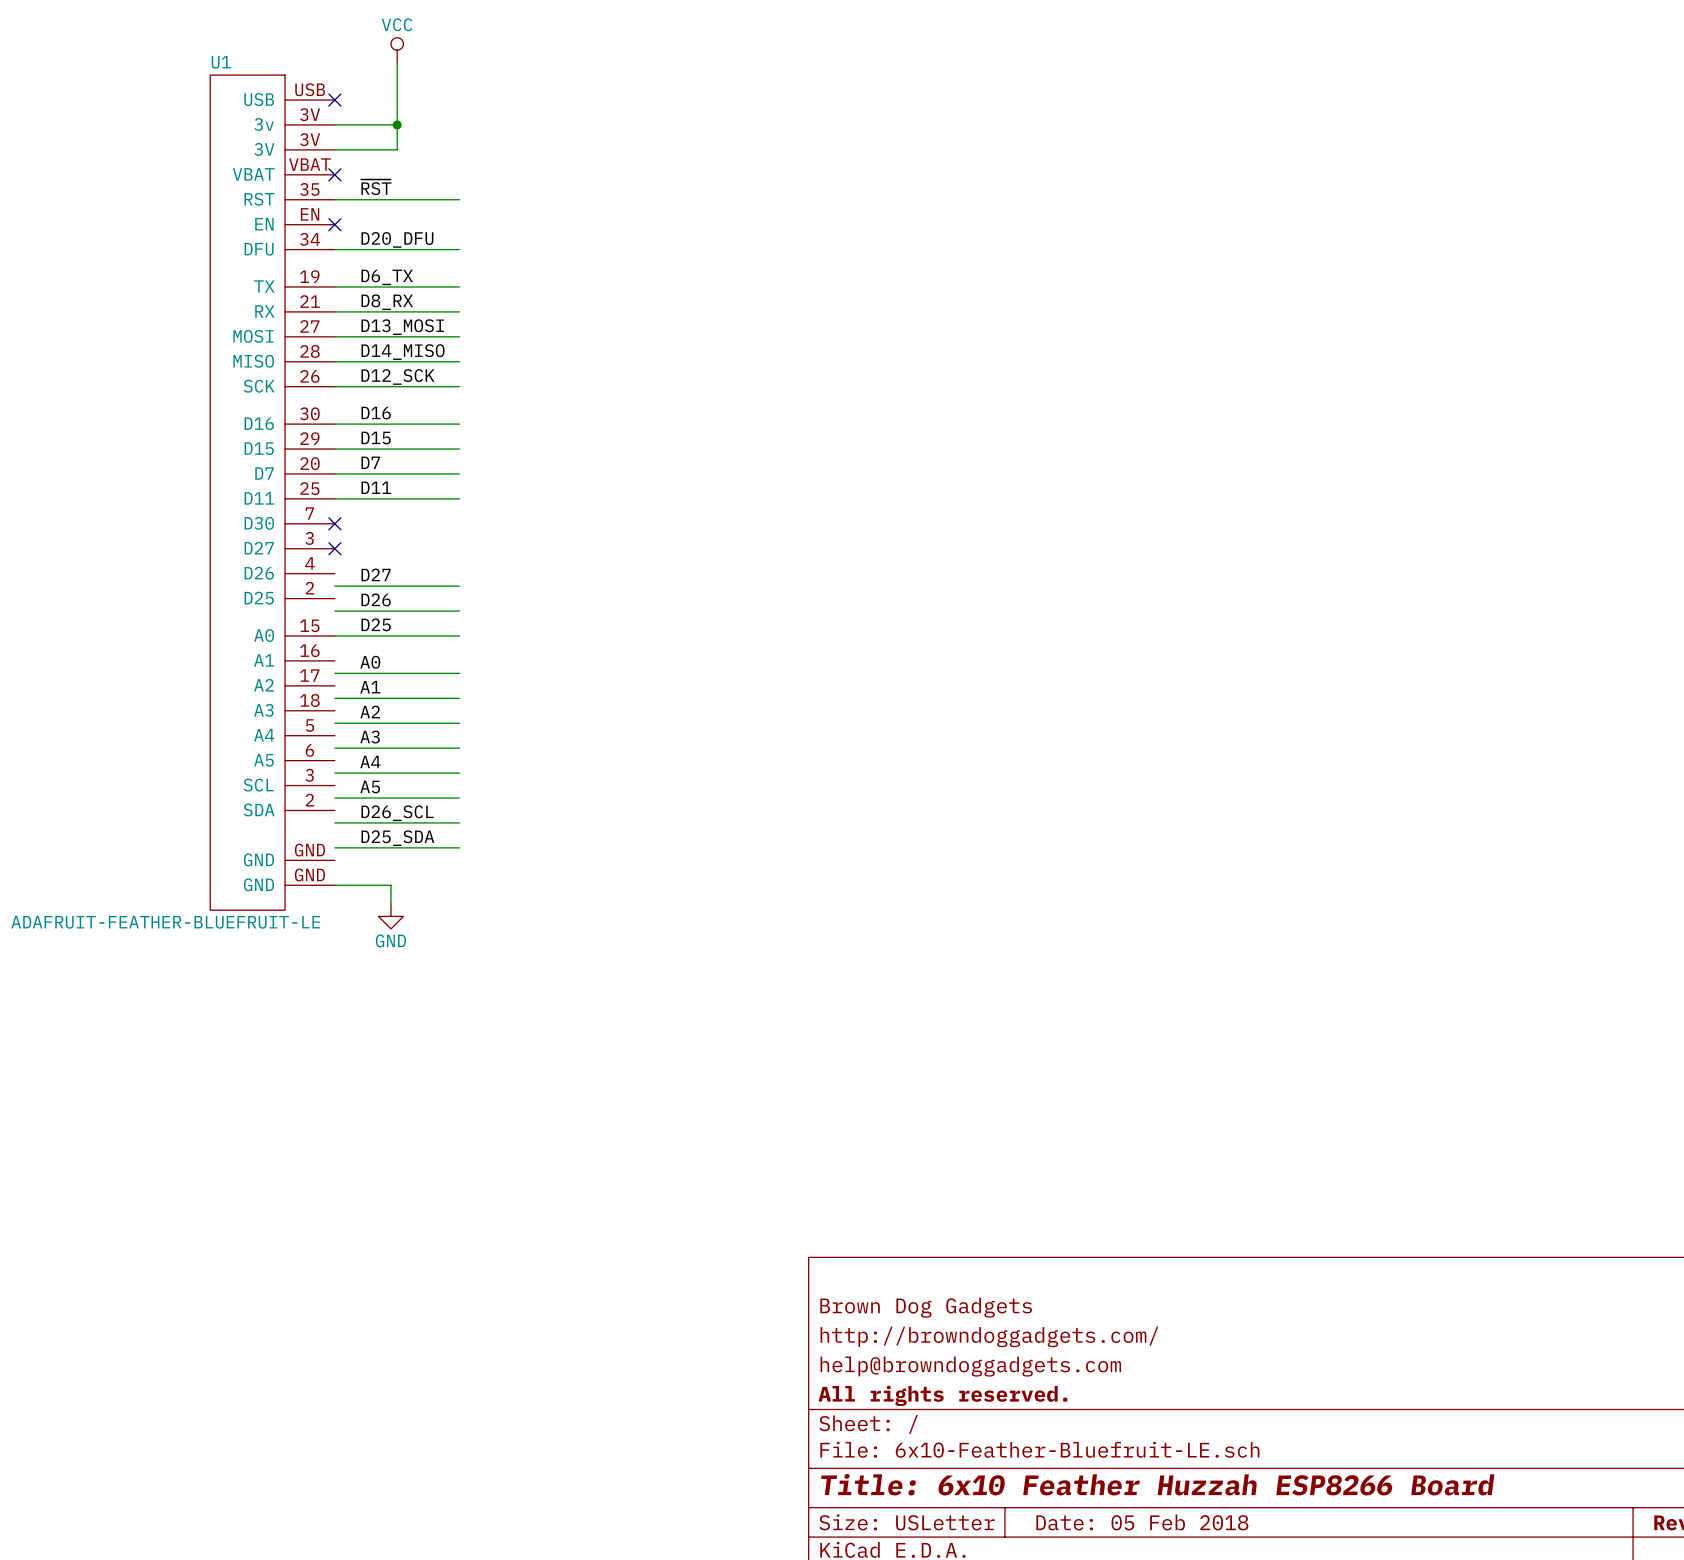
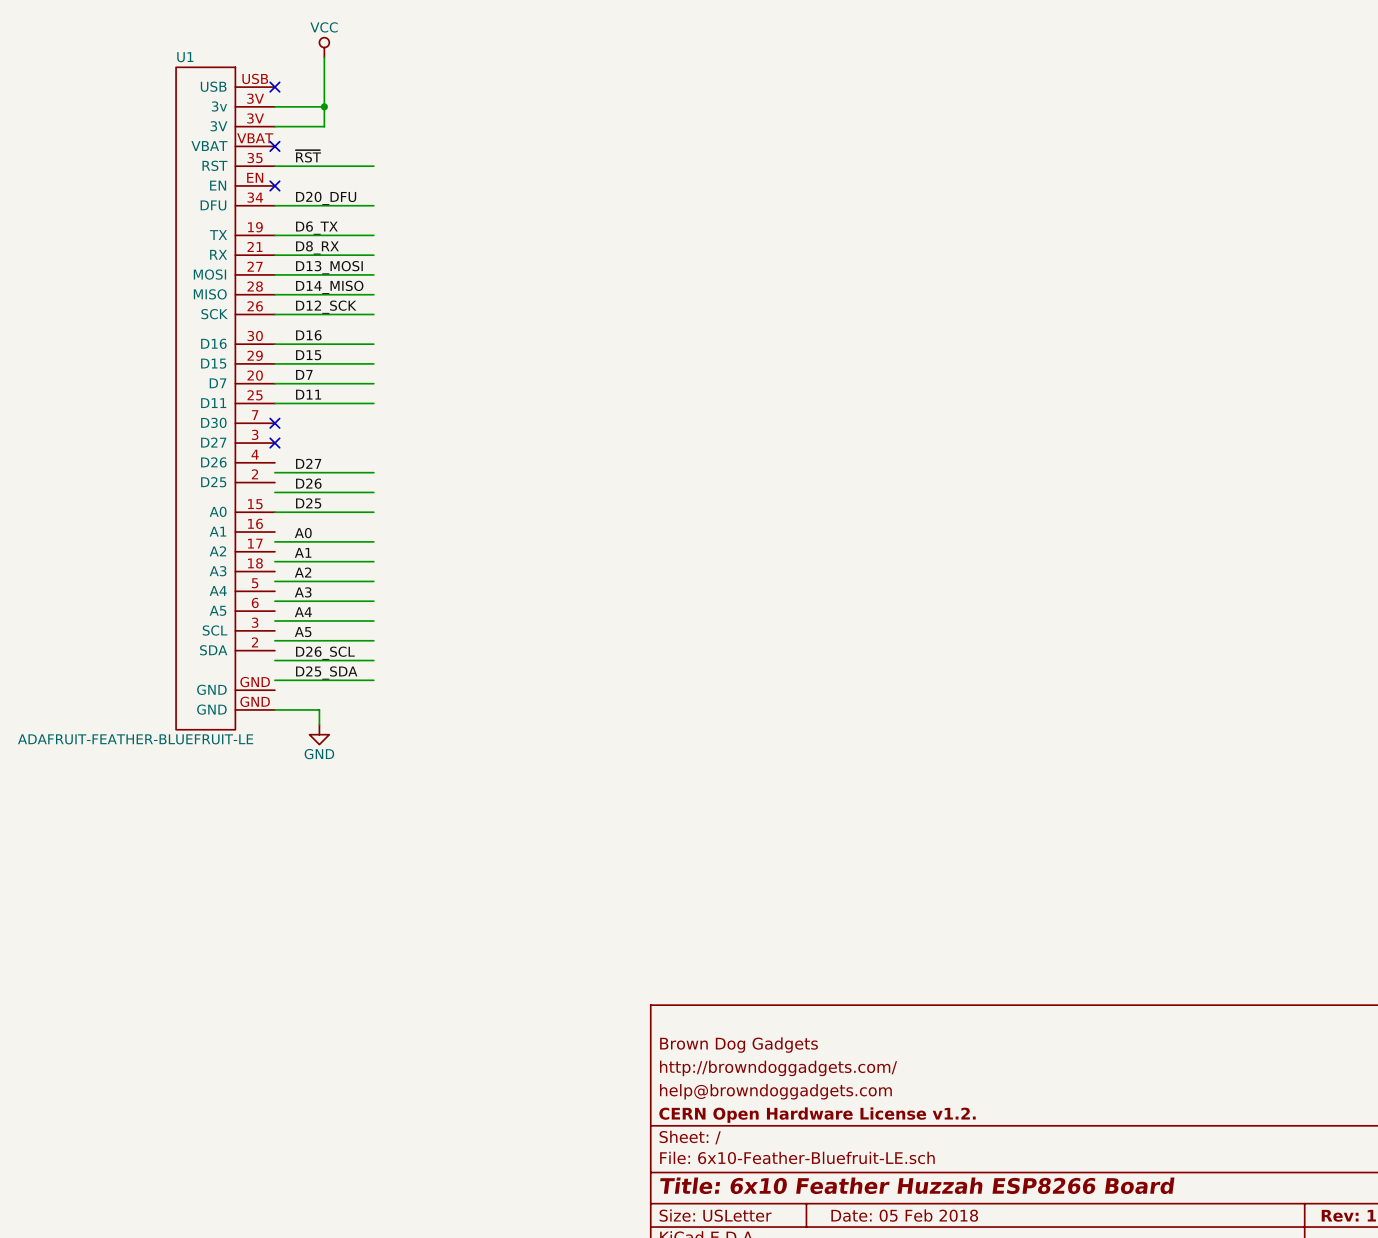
title block: All rights reserved. (943, 1395) -> CERN Open Hardware License v1.2. (817, 1115)

